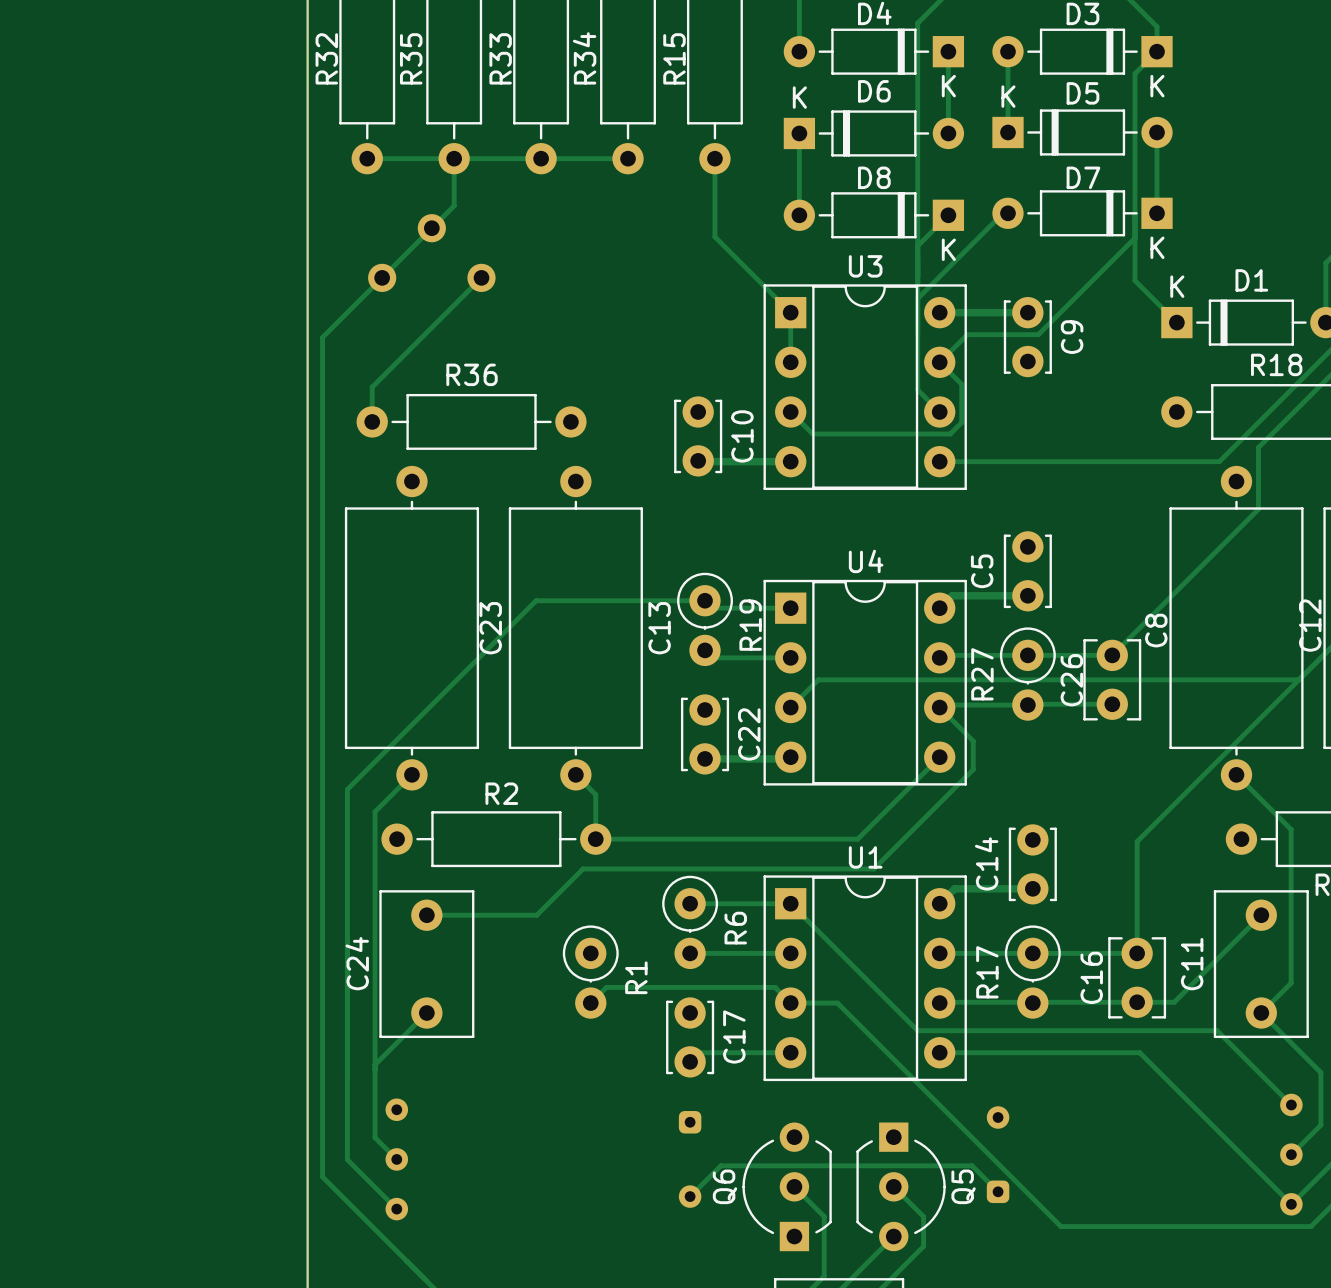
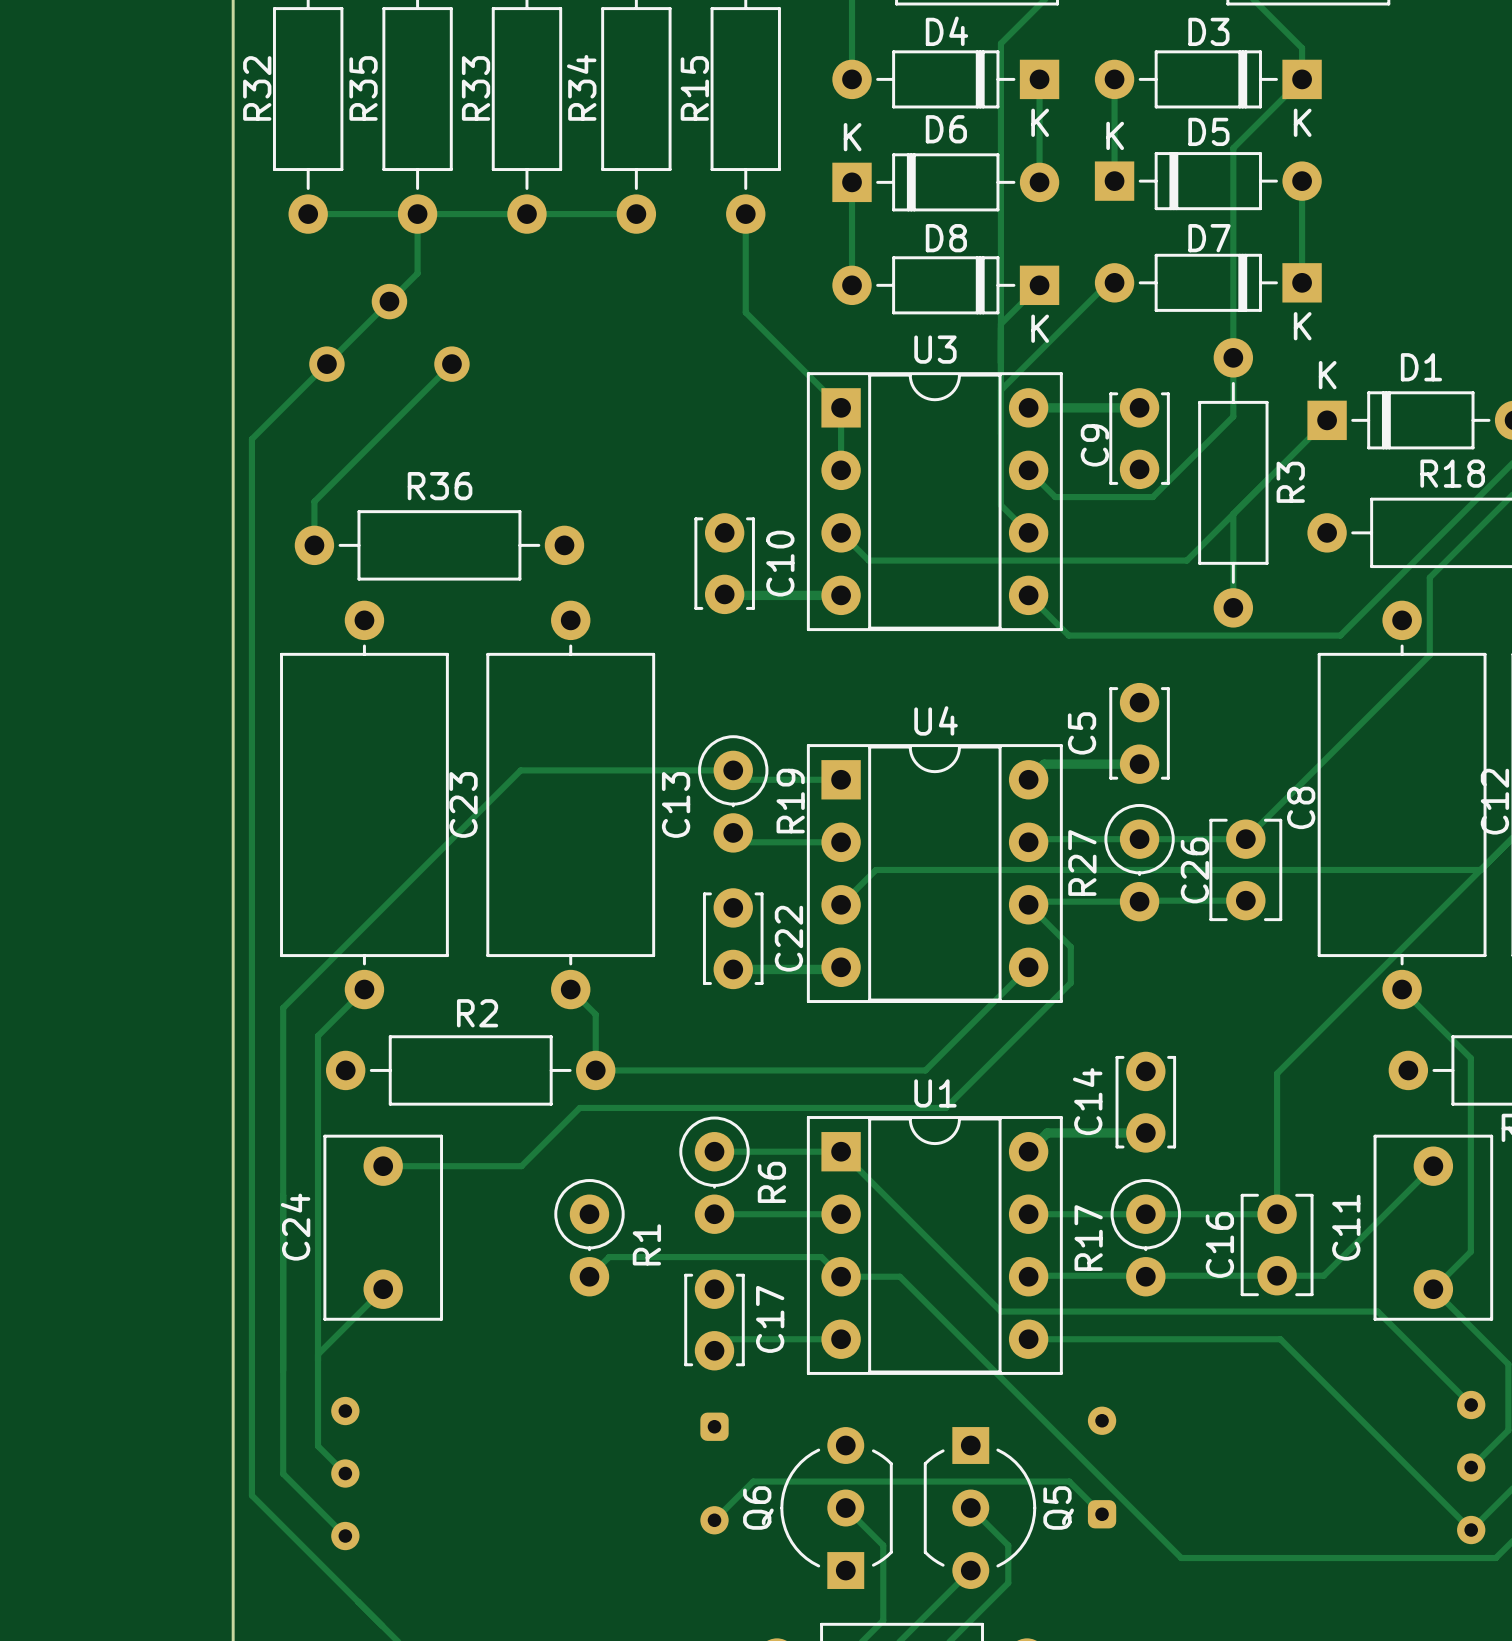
track: (1135, 73) (1135, 280) (1176, 322) -> (1274, 107) (1233, 148) (1233, 416) (1152, 497) (1055, 497)
track: (1135, 238) (1038, 334) (967, 334) (939, 362) -> none
C9 name position: C9 (1072, 337) -> C9 (1094, 445)
R3: none -> (1233, 482)
track: (960, 383) (961, 422) (950, 433) -> (1327, 420) (1186, 560) (1041, 560)
track: none -> (1233, 514) (1233, 607)
track: (939, 461) (1219, 461) -> (1028, 595) (1068, 635) (1340, 635) (1380, 595)

